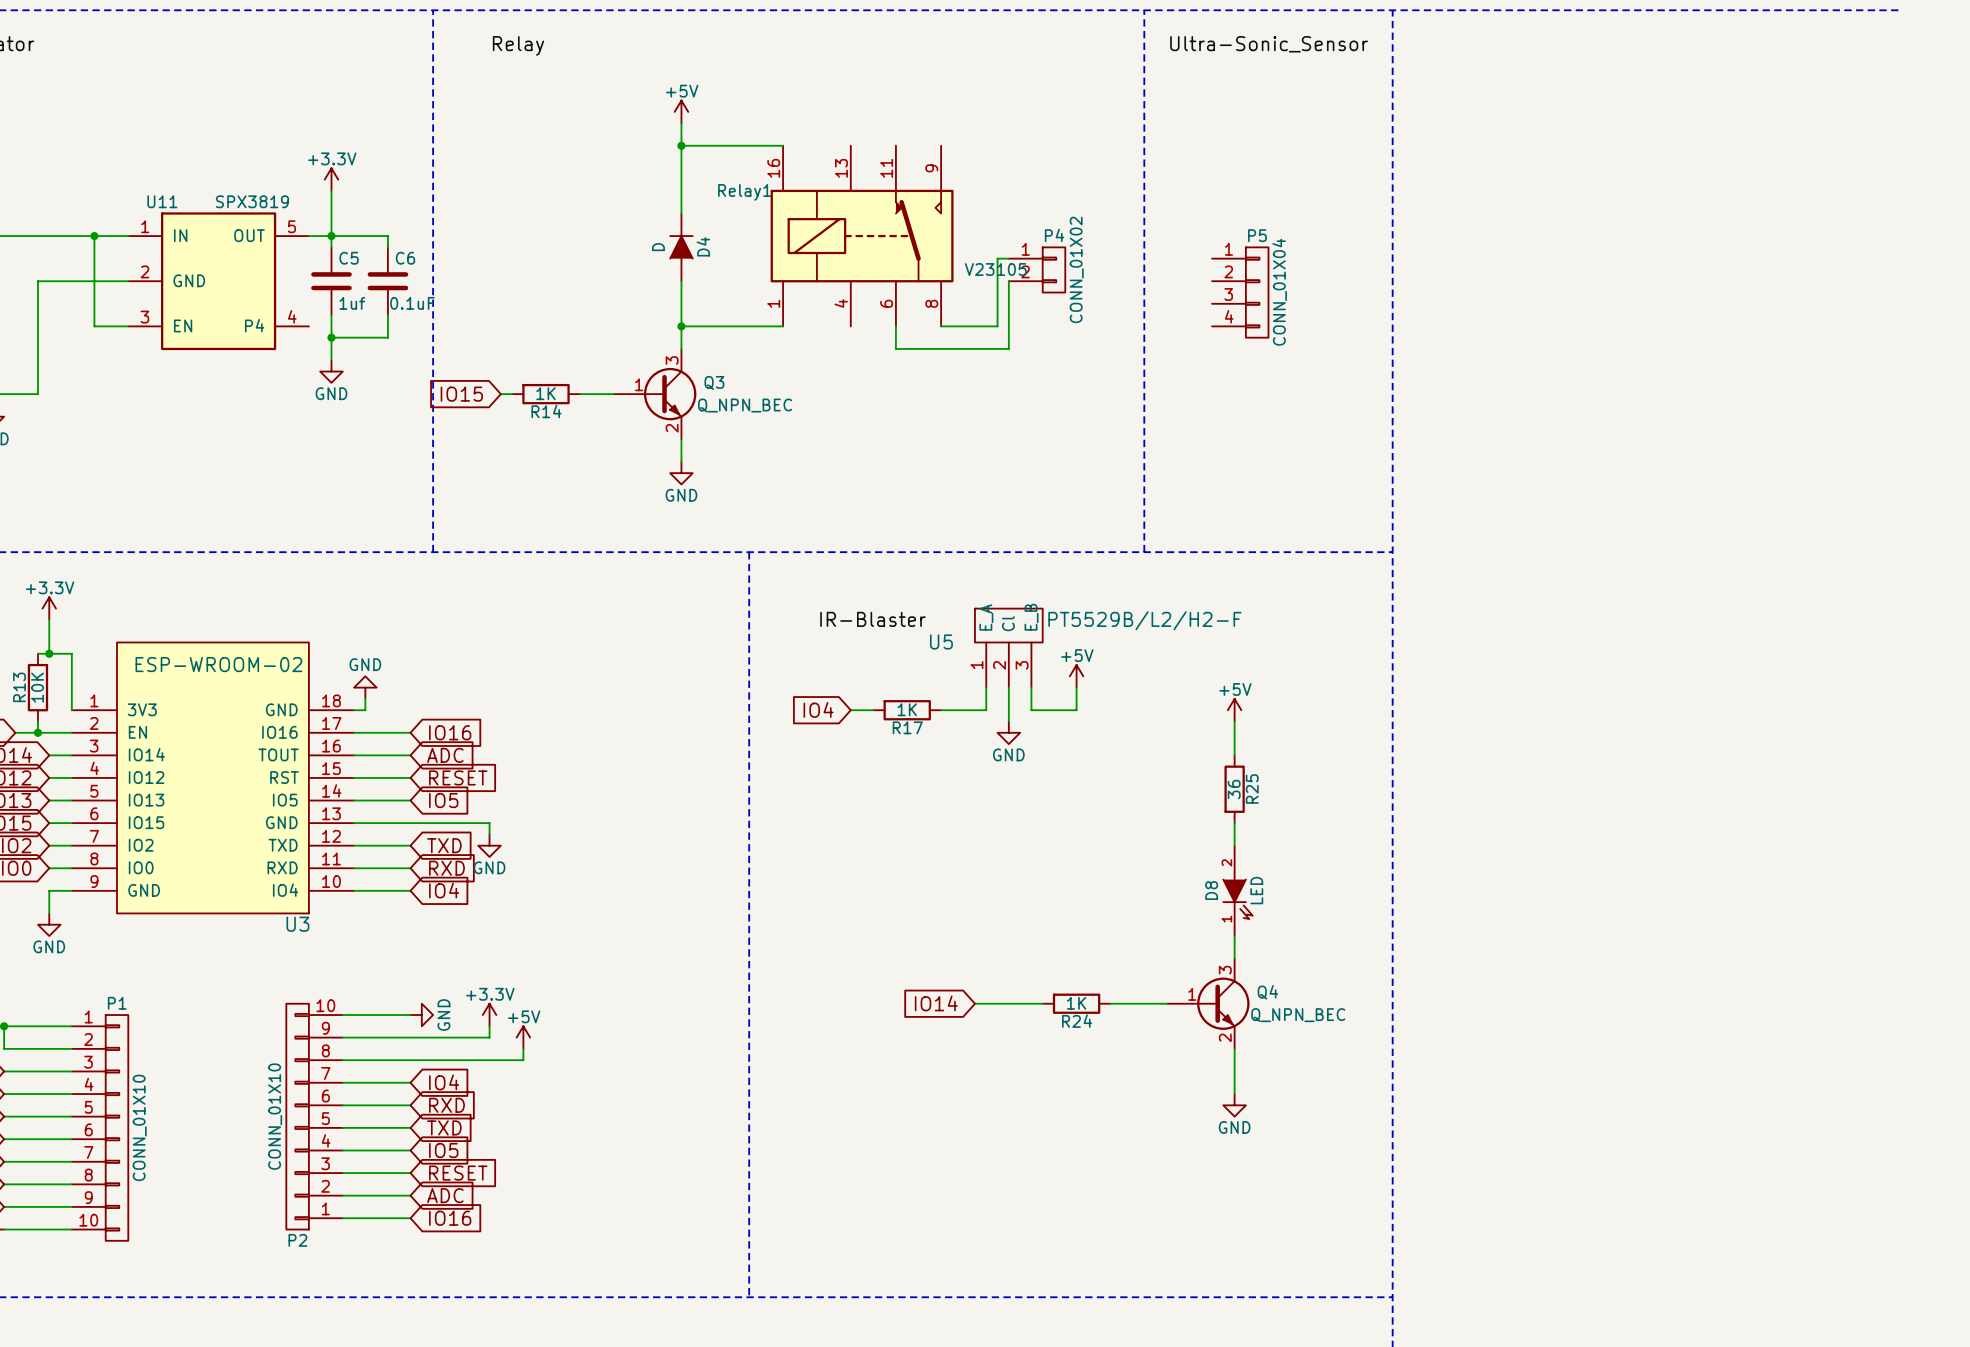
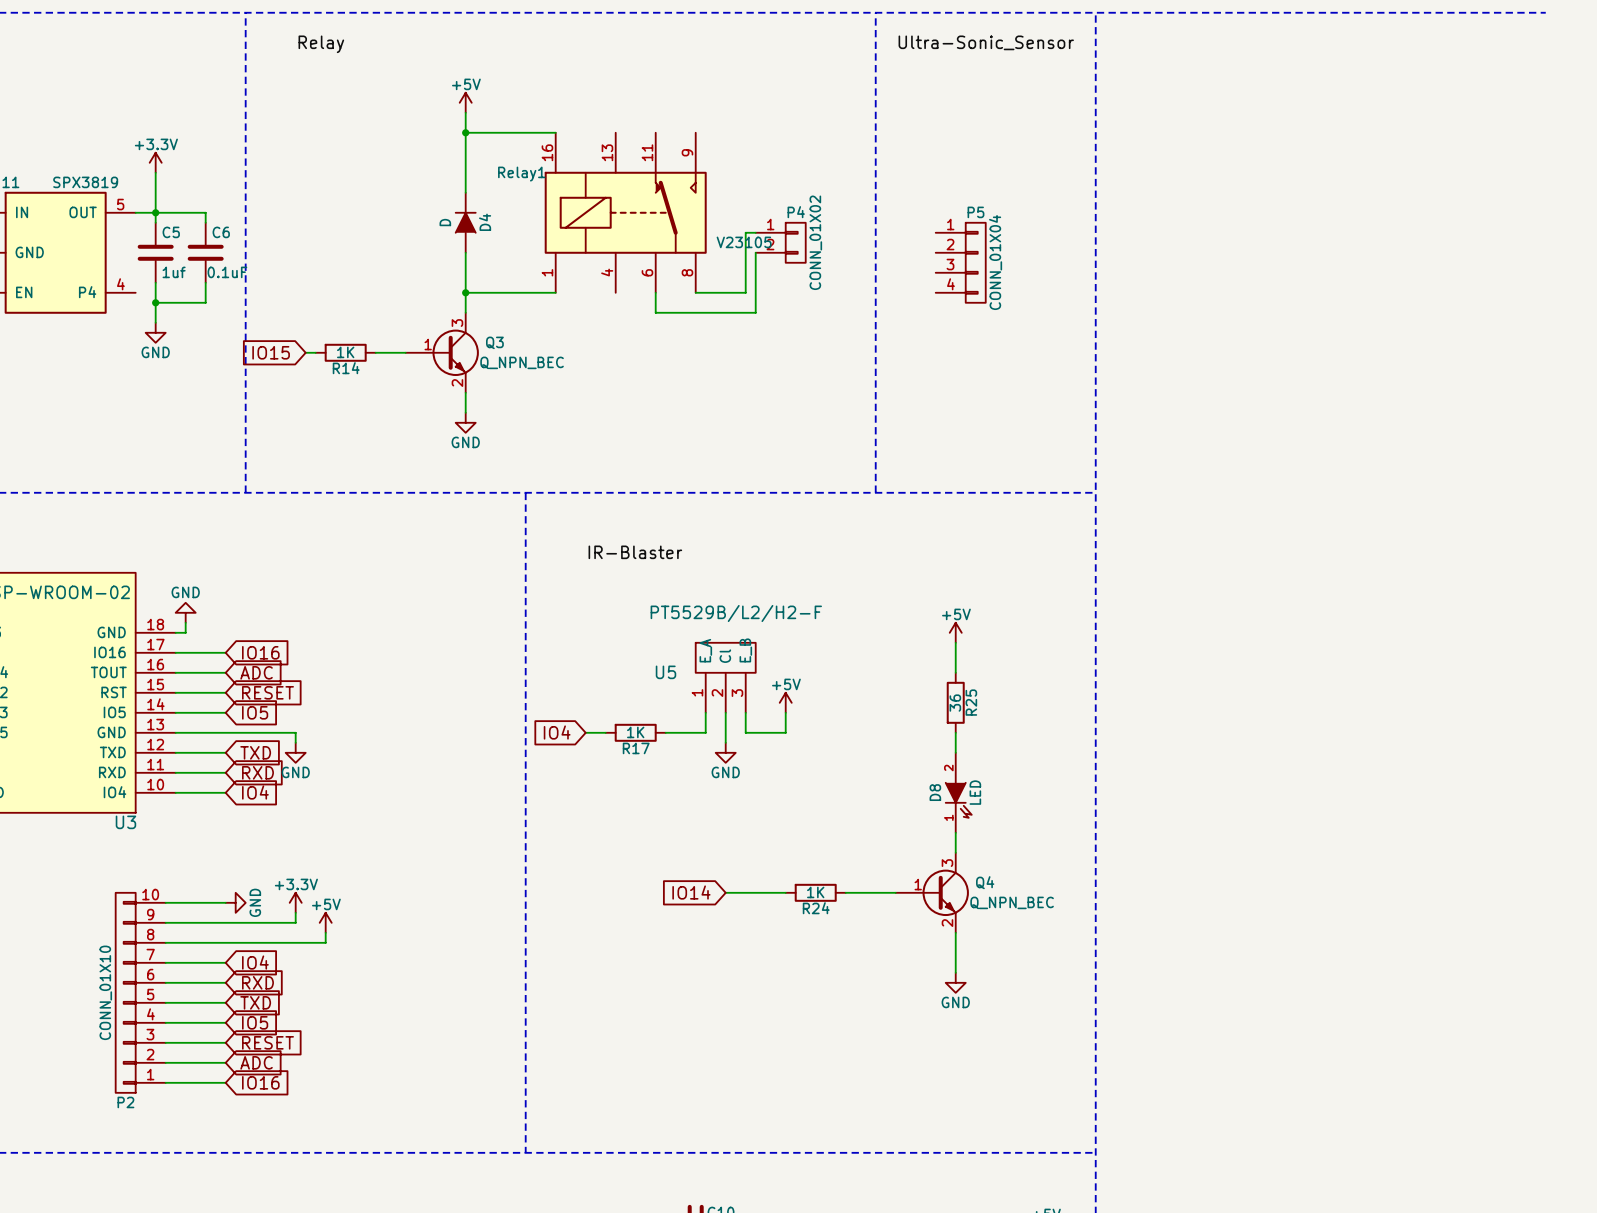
U5 value position: PT5529B/L2/H2-F (1144, 620) -> PT5529B/L2/H2-F (736, 613)
U5 position: (1008, 648) -> (725, 677)
power symbol position: +5V (1076, 676) -> +5V (785, 702)
wire: (986, 687) (986, 710) (941, 710) -> (705, 712) (705, 732) (665, 732)
wire: (1008, 687) (1008, 721) -> (725, 712) (725, 742)
wire: (1031, 687) (1031, 710) (1076, 710) (1076, 687) -> (745, 712) (745, 732) (785, 732) (785, 712)
global label position: IO4 (818, 709) -> IO4 (557, 732)
wire: (850, 710) (873, 710) -> (585, 732) (605, 732)
R17 position: (907, 710) -> (635, 732)
power symbol position: GND (1008, 732) -> GND (725, 752)

